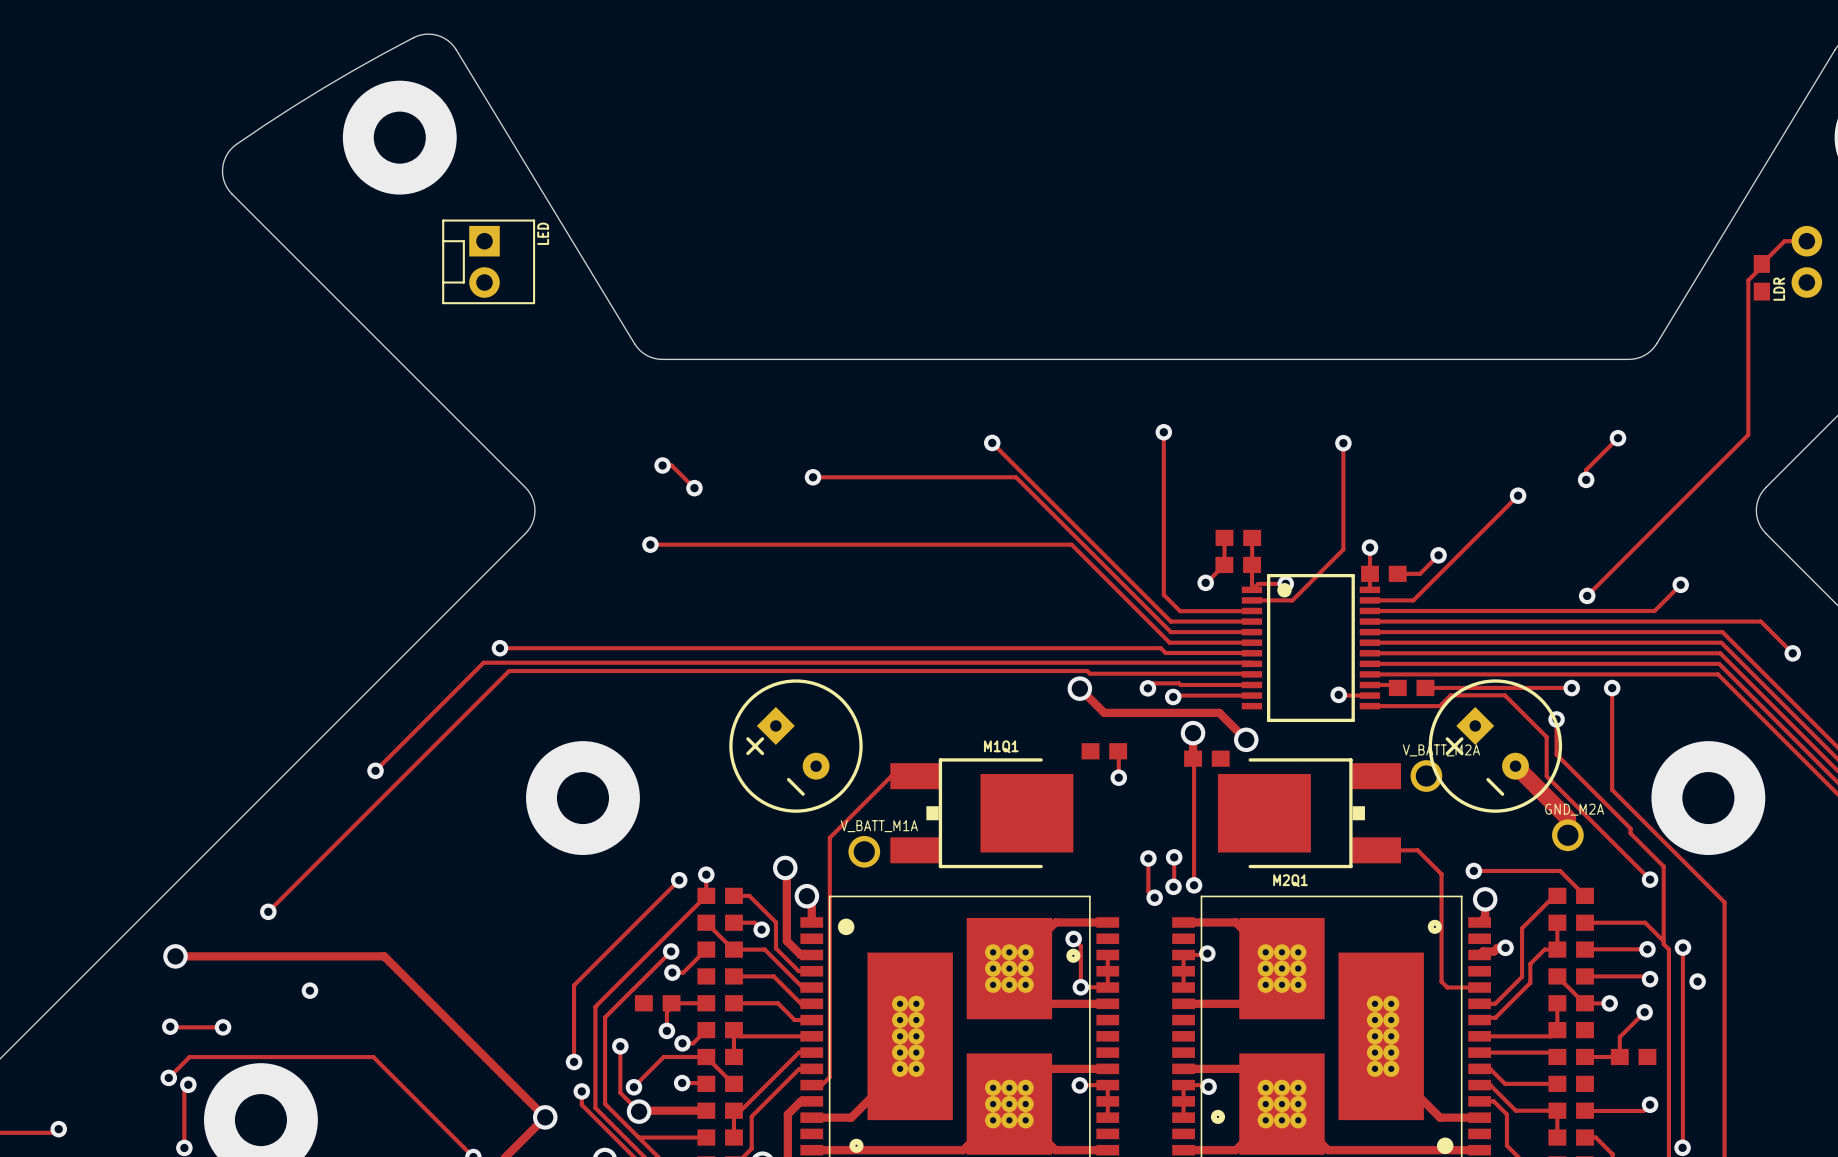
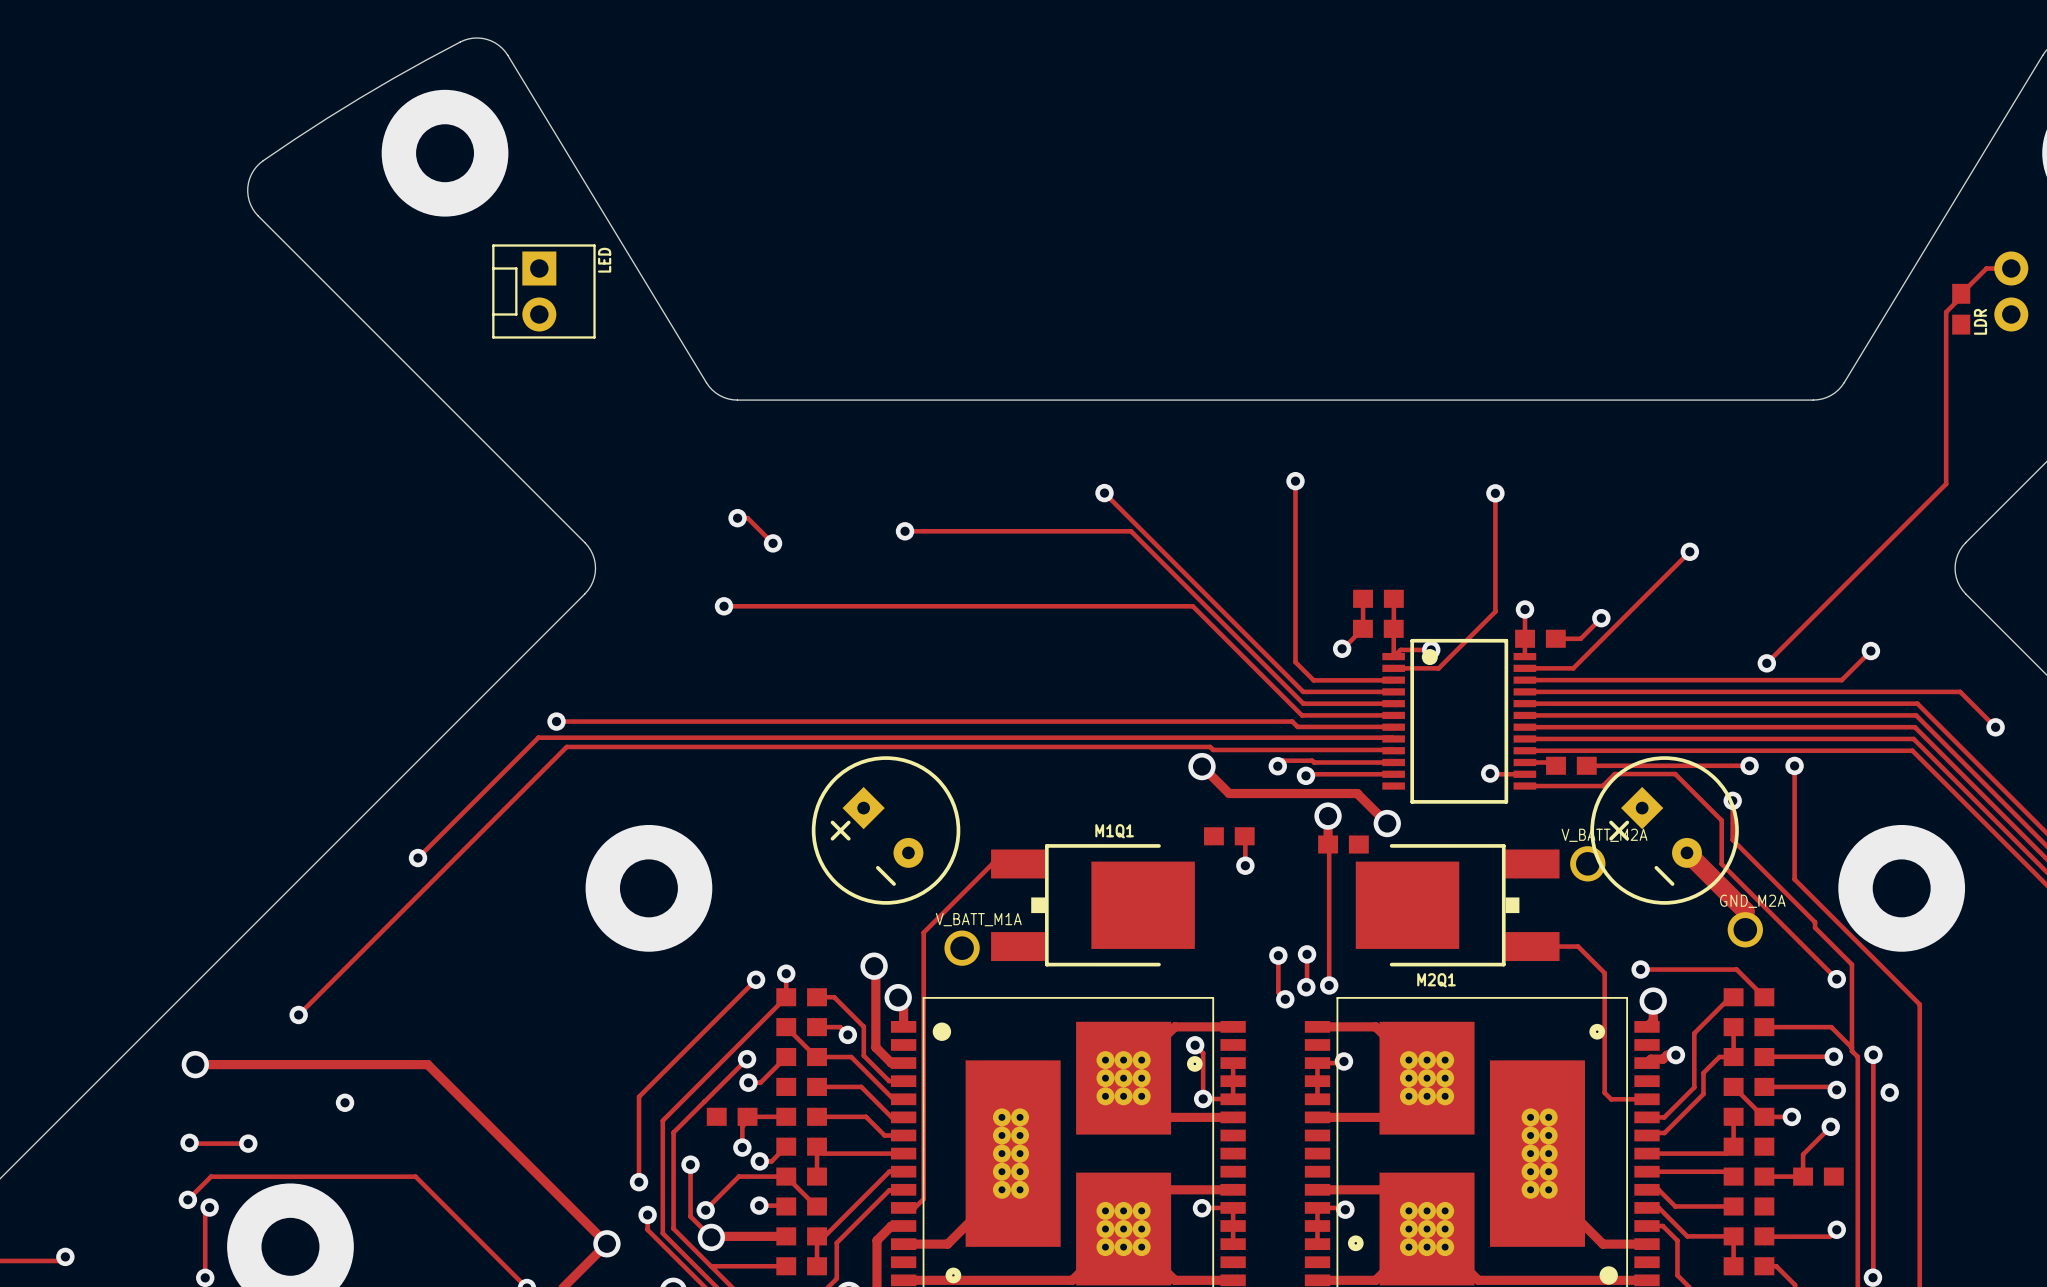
track: (1618, 438) (1586, 469) (1586, 479) -> none
via: (1618, 438) -> none
via: (1586, 479) -> none

